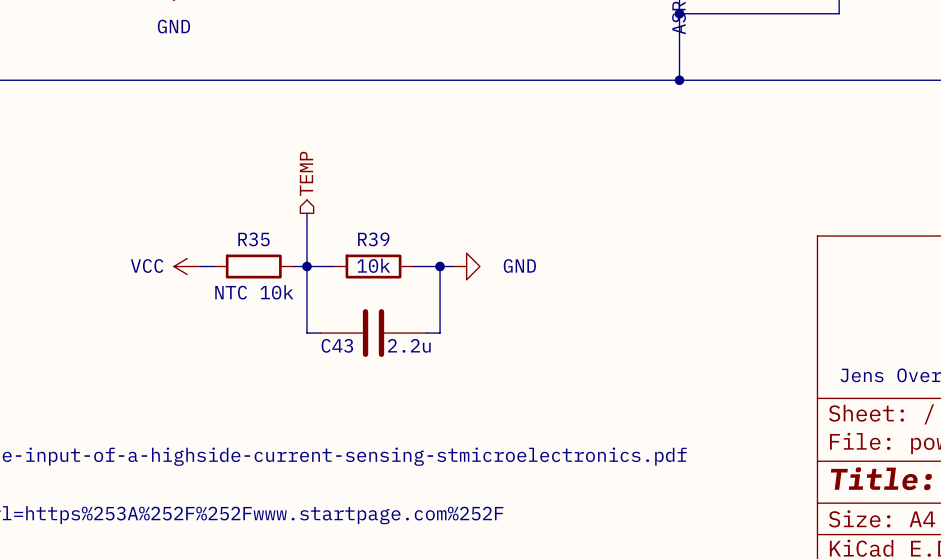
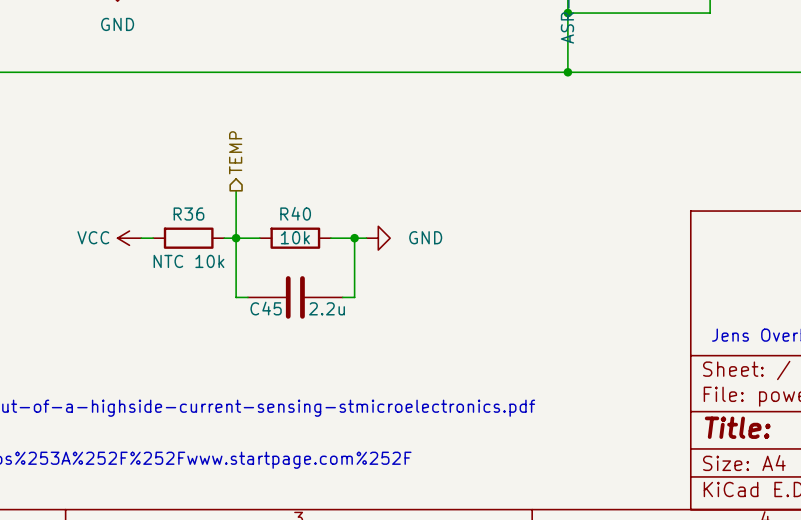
R35 name: R35 (254, 239) -> R36 (188, 214)
R39 name: R39 (373, 239) -> R40 (295, 213)
C43 name: C43 (337, 345) -> C45 (266, 308)

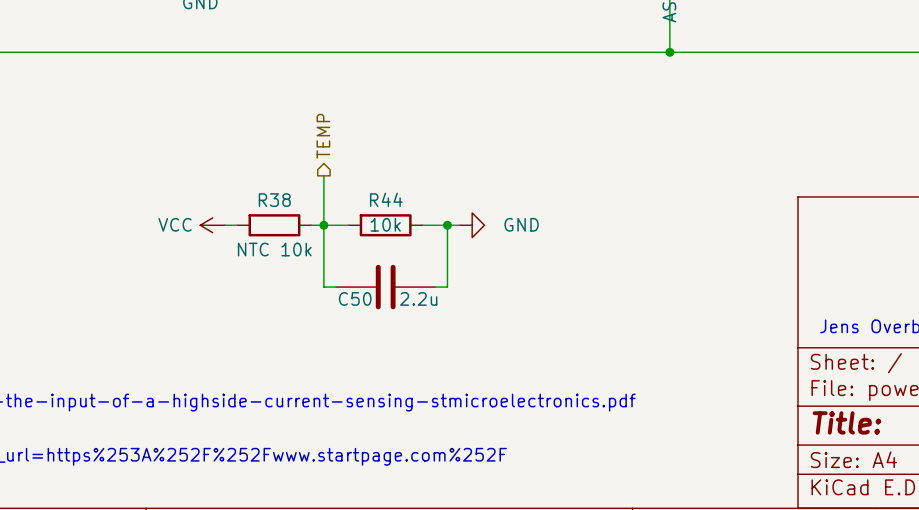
R40 name: R40 (295, 213) -> R44 (386, 199)
R36 name: R36 (188, 214) -> R38 (274, 200)
C45 name: C45 (266, 308) -> C50 (355, 298)

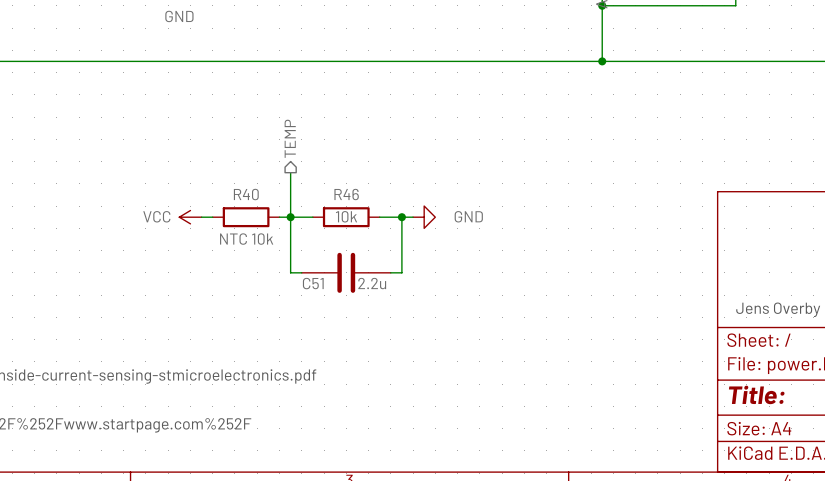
R44 name: R44 (386, 199) -> R46 (346, 194)
R38 name: R38 (274, 200) -> R40 (246, 194)
C50 name: C50 (355, 298) -> C51 (313, 283)

